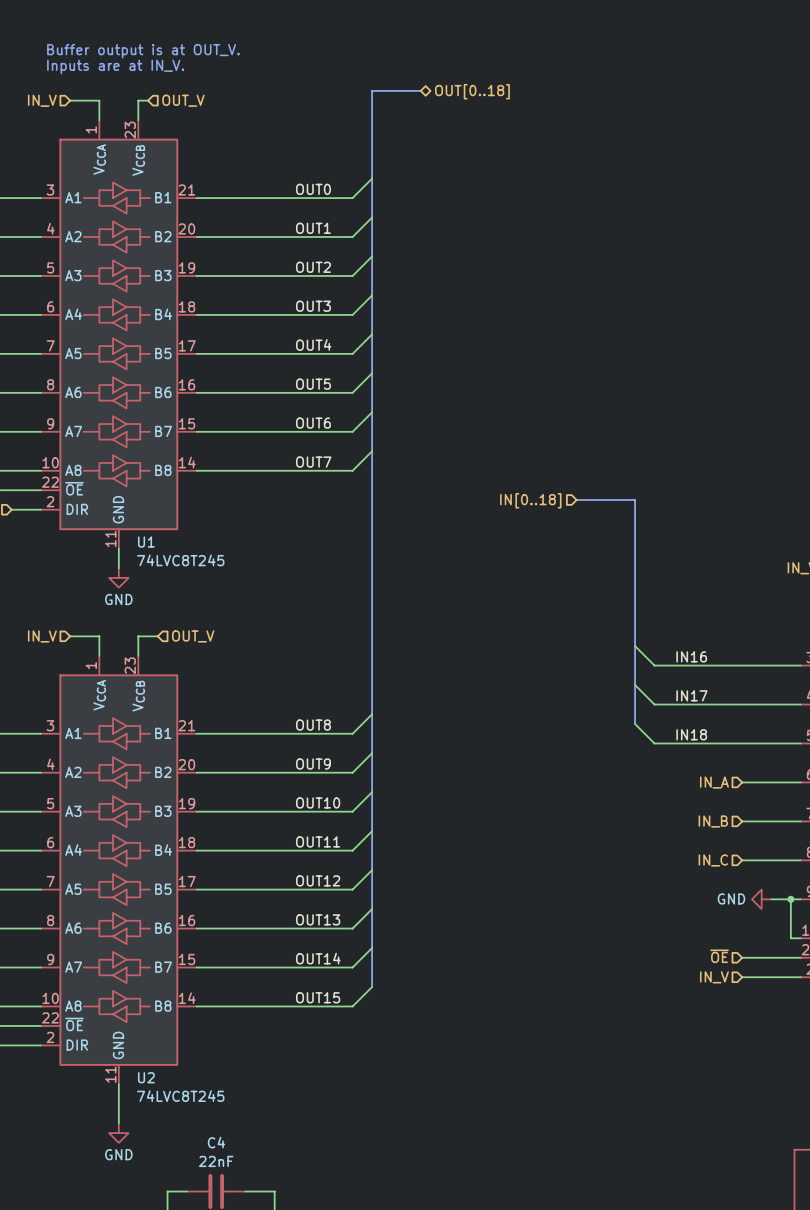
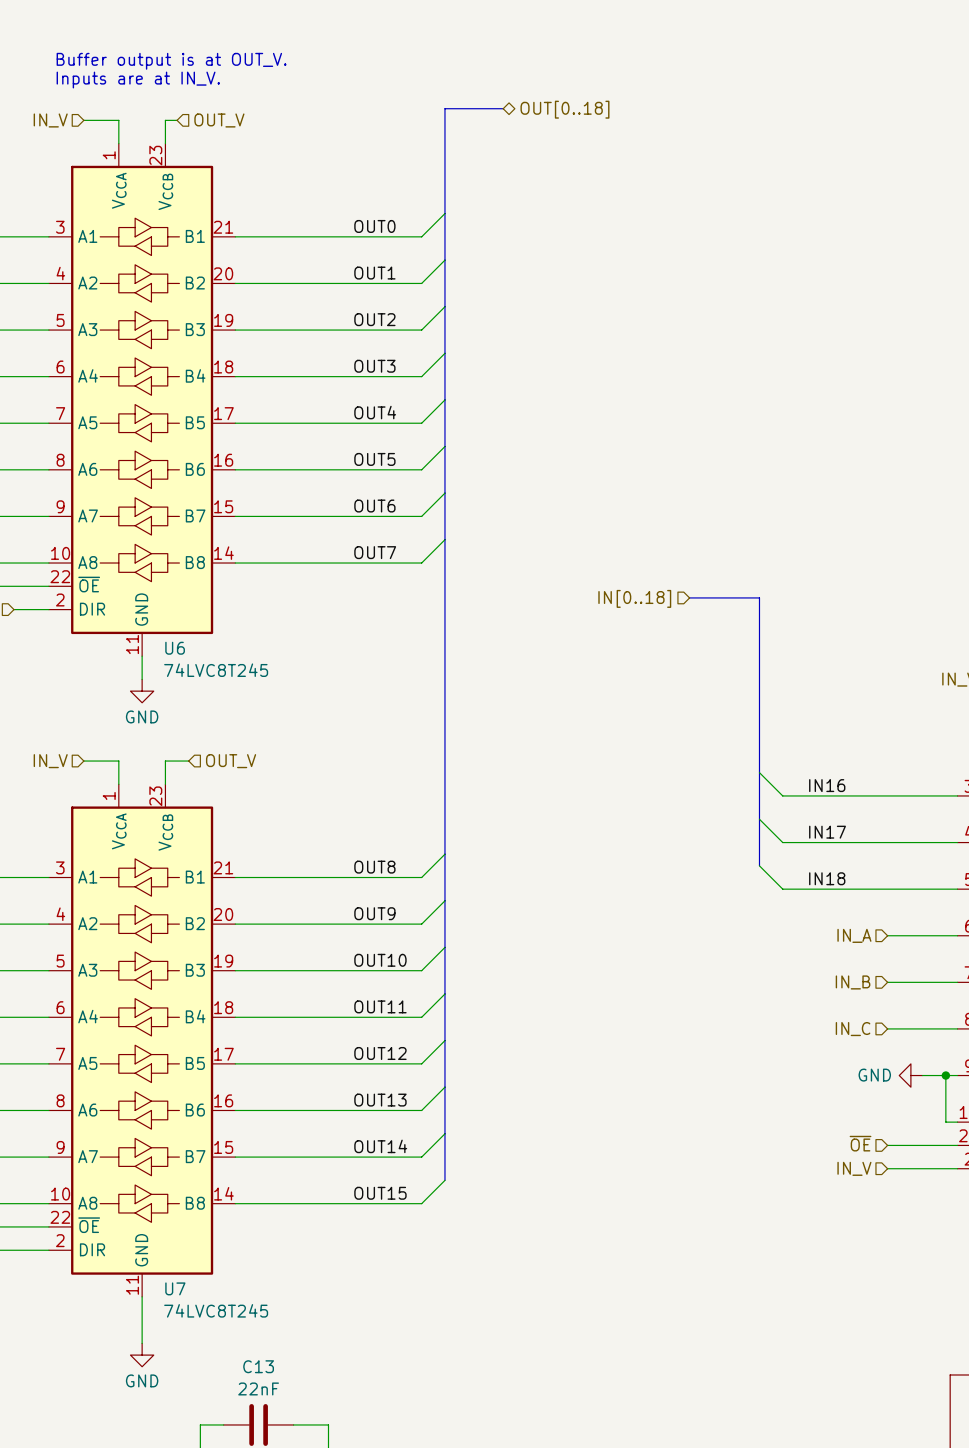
U1 name: U1 (146, 542) -> U6 (175, 648)
U2 name: U2 (146, 1077) -> U7 (175, 1288)
C4 name: C4 (216, 1142) -> C13 (258, 1366)

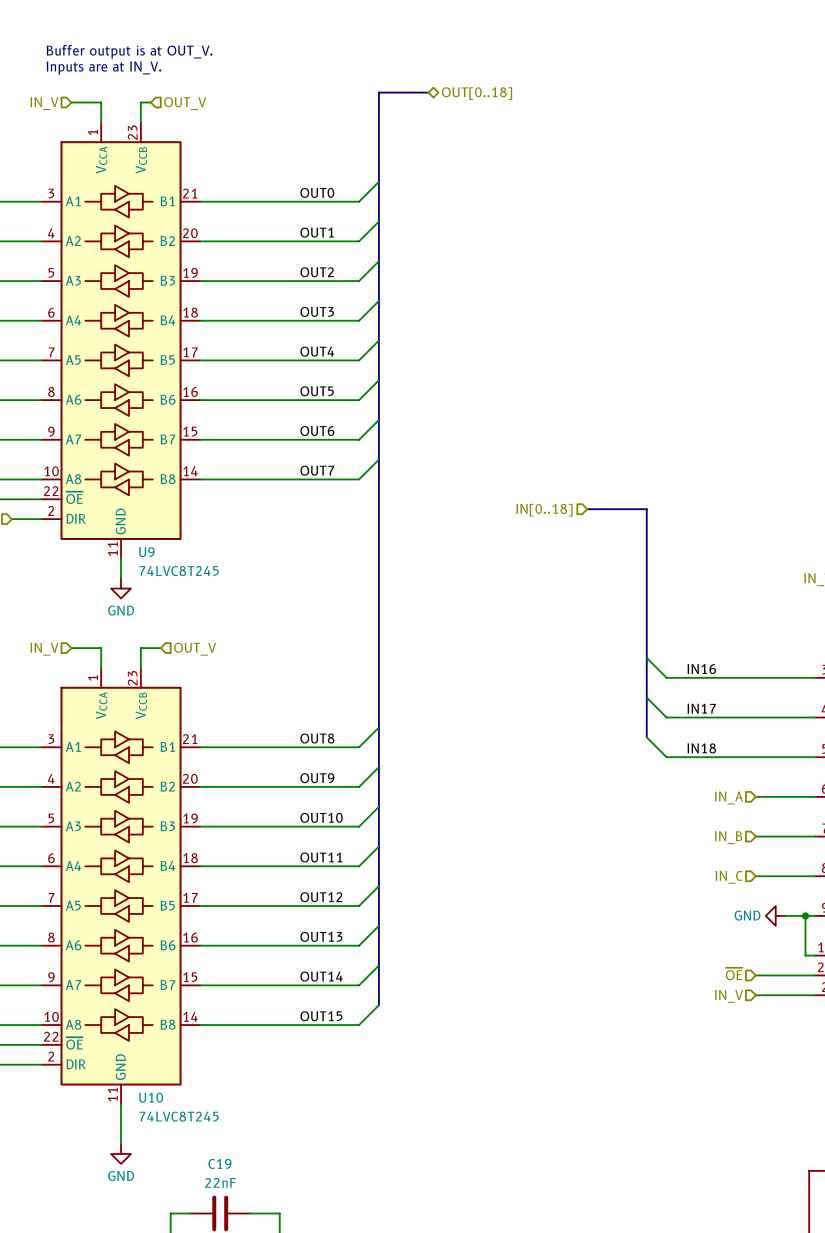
U6 name: U6 (175, 648) -> U9 (146, 552)
U7 name: U7 (175, 1288) -> U10 (151, 1097)
C13 name: C13 (258, 1366) -> C19 (219, 1163)

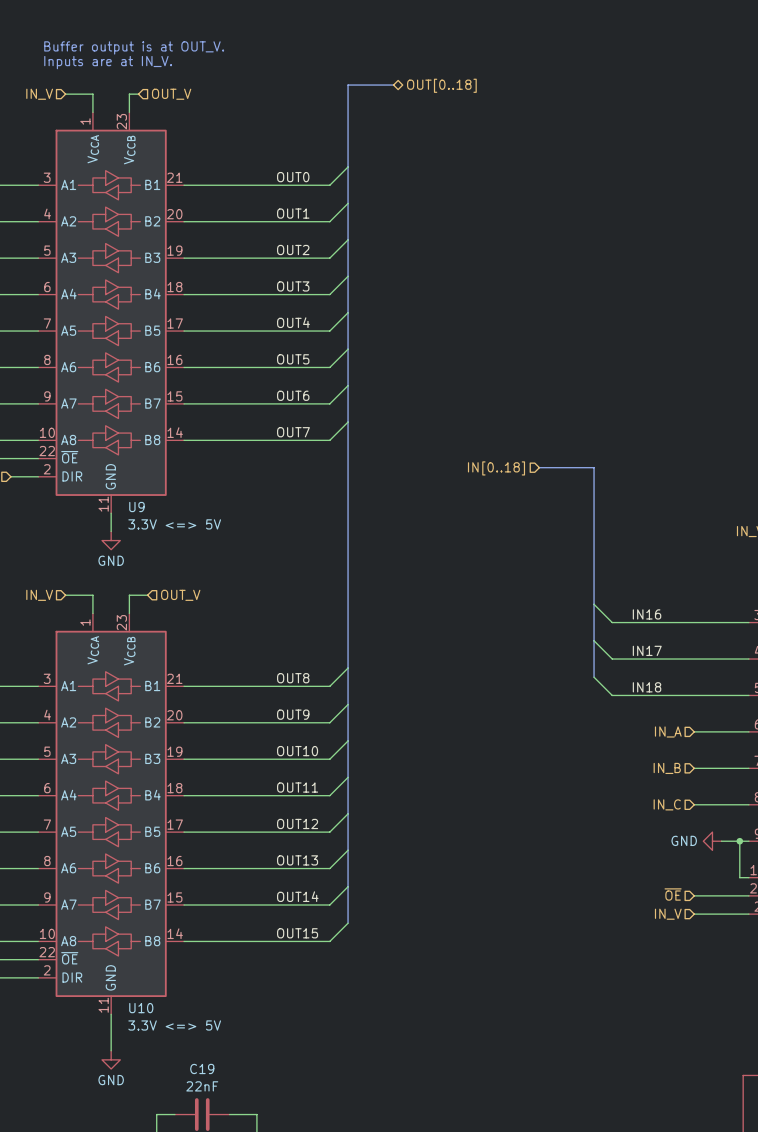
U9 value: 74LVC8T245 (179, 571) -> 3.3V <=> 5V (174, 524)
U10 value: 74LVC8T245 (179, 1116) -> 3.3V <=> 5V (174, 1025)

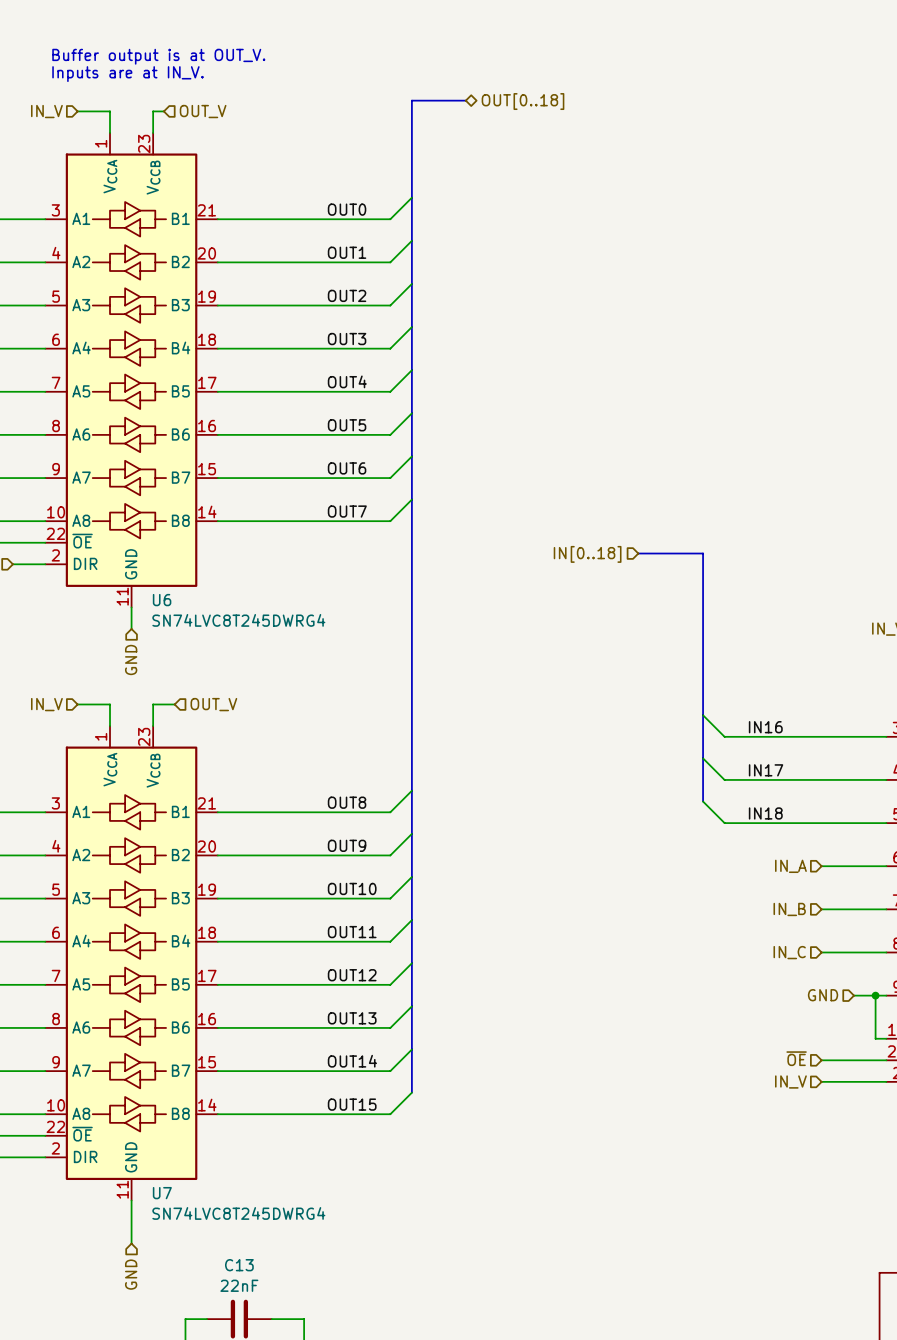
U9 name: U9 (136, 507) -> U6 (162, 600)
U9 value: 3.3V <=> 5V (174, 524) -> SN74LVC8T245DWRG4 (238, 620)
power symbol: GND (111, 540) -> none
hierarchical label: none -> GND (131, 659)
hierarchical label: none -> GND (823, 995)
power symbol: GND (712, 841) -> none
U10 name: U10 (141, 1008) -> U7 (162, 1193)
U10 value: 3.3V <=> 5V (174, 1025) -> SN74LVC8T245DWRG4 (238, 1213)
power symbol: GND (111, 1059) -> none
C19 name: C19 (202, 1068) -> C13 (239, 1265)
hierarchical label: none -> GND (131, 1274)

